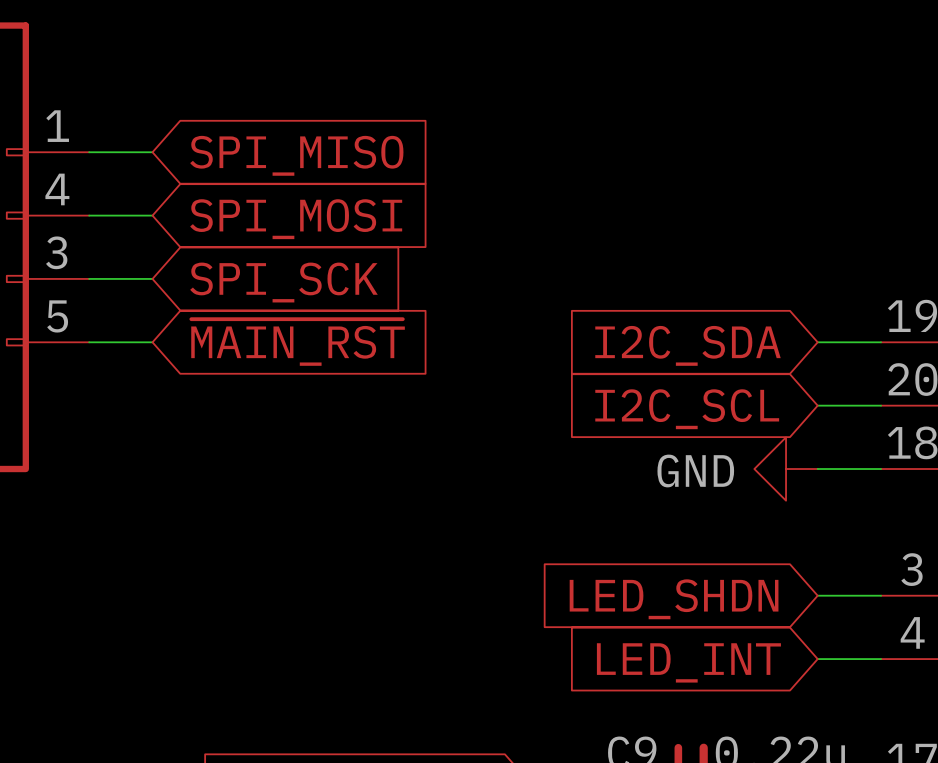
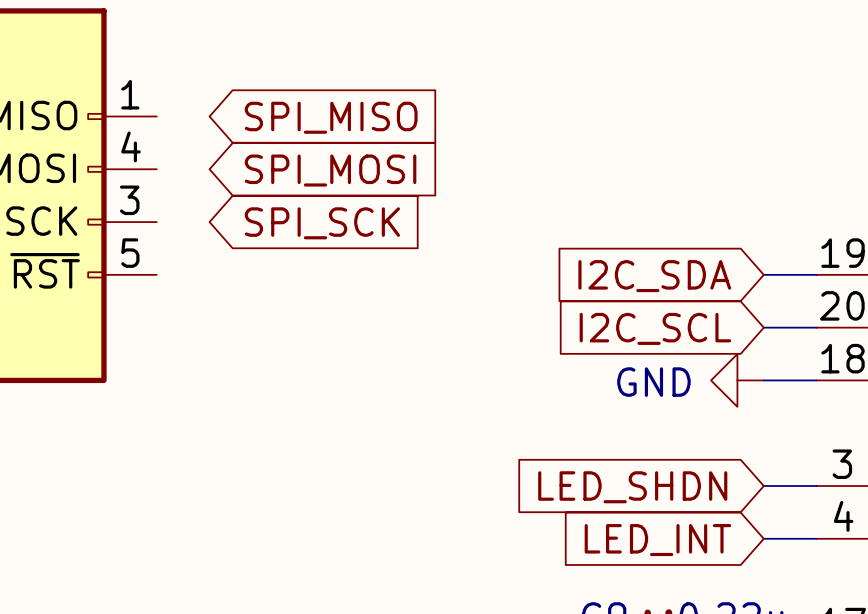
wire: (89, 152) (152, 152) -> none
wire: (89, 215) (152, 215) -> none
wire: (89, 278) (152, 278) -> none
wire: (89, 342) (152, 342) -> none
global label: ~{MAIN_RST} (298, 342) -> none

